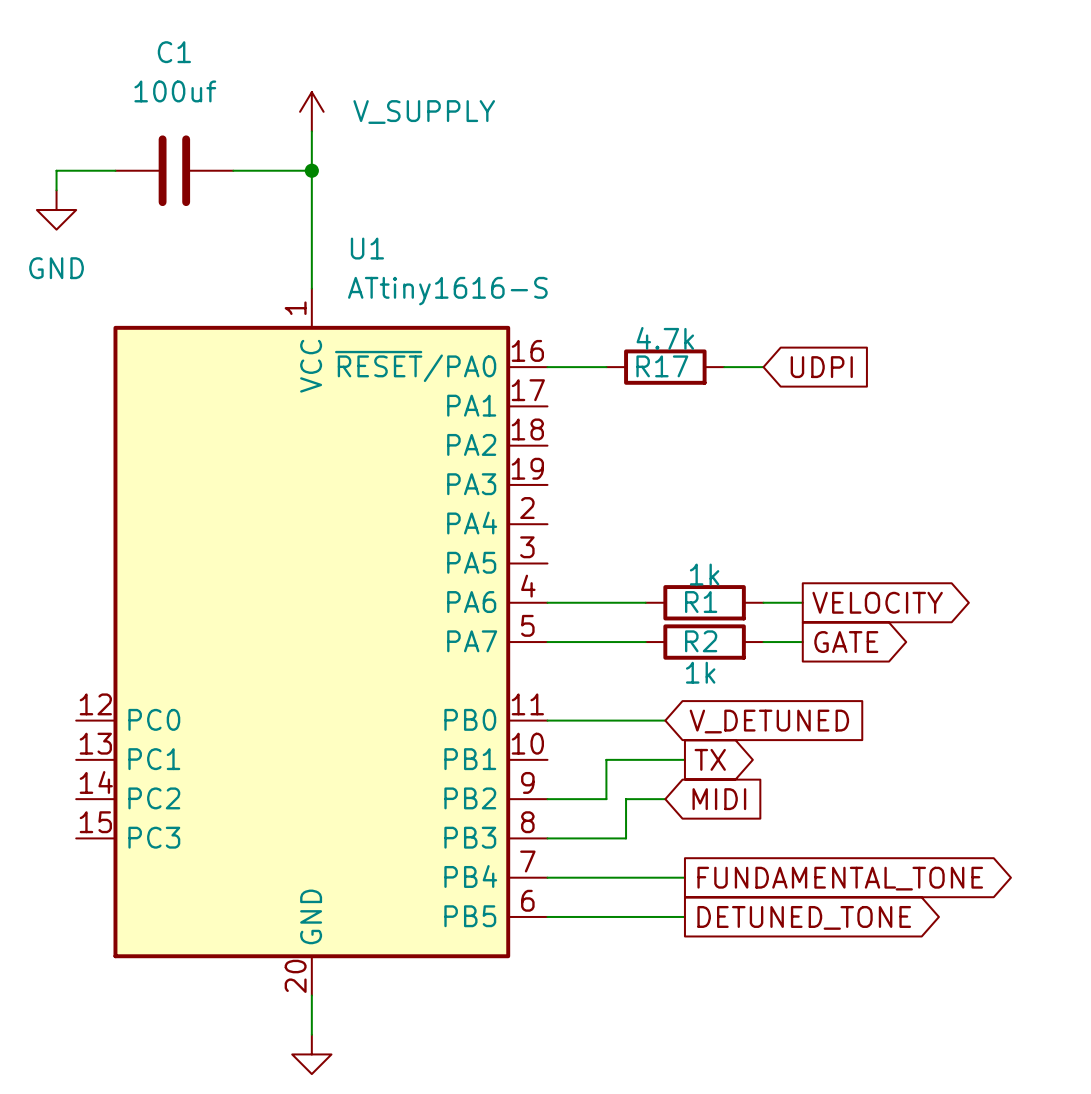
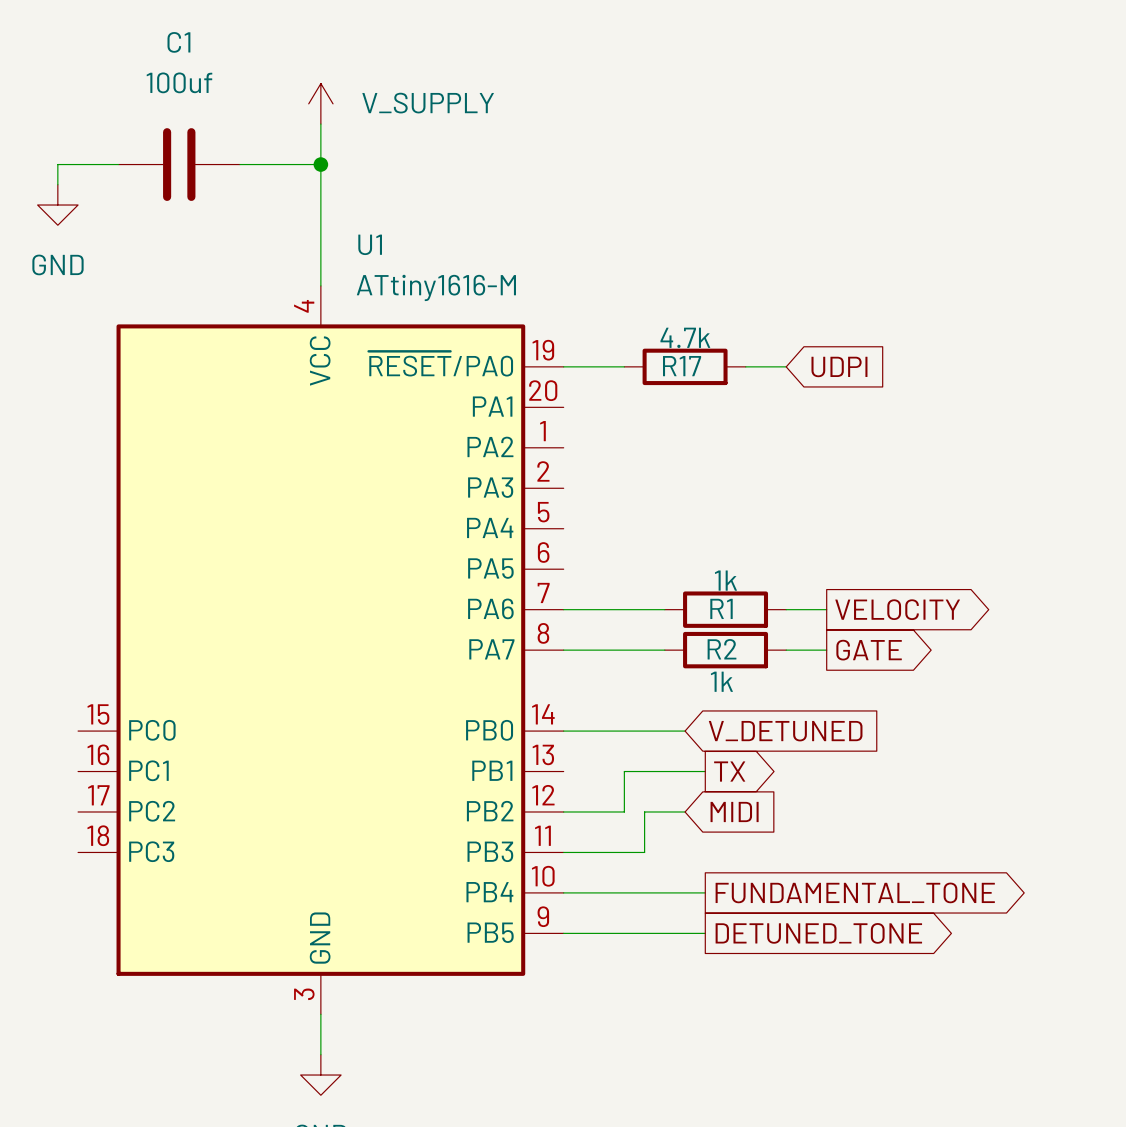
U1 symbol: [76, 288, 548, 996] -> [78, 285, 564, 1015]
U1 value: ATtiny1616-S (447, 291) -> ATtiny1616-M (436, 287)

